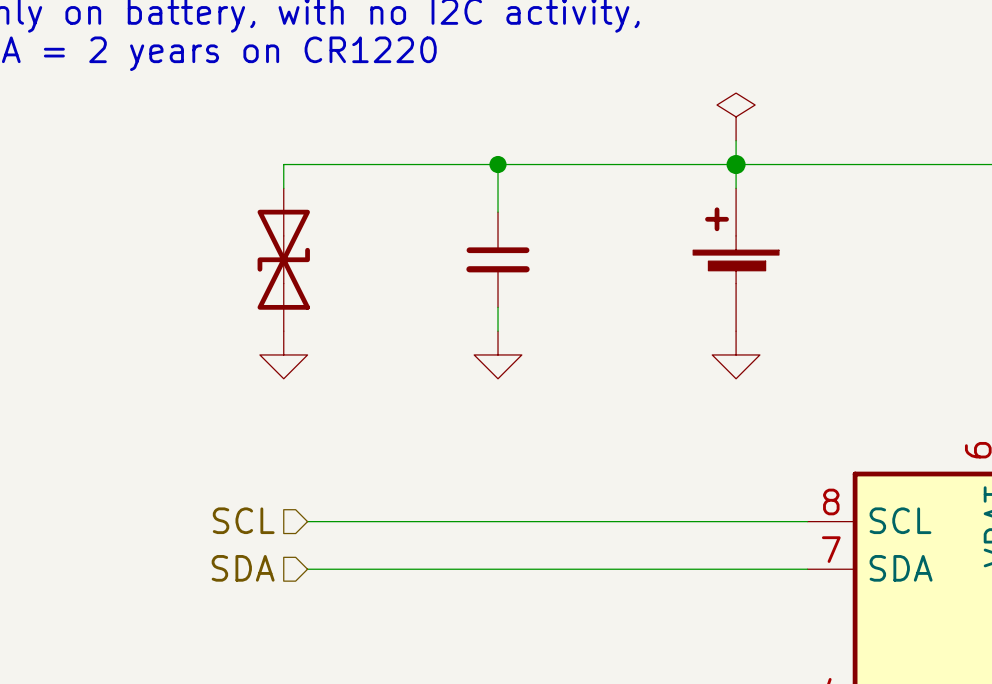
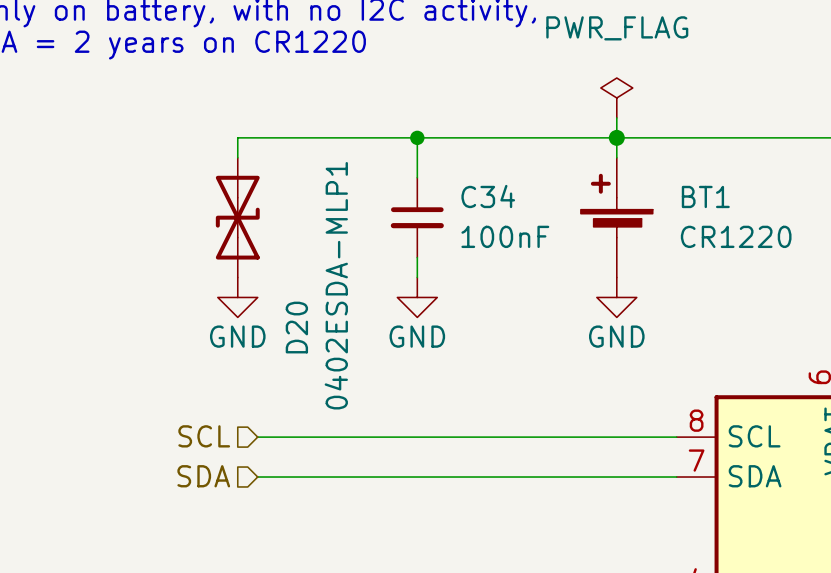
power symbol text: none -> PWR_FLAG (617, 28)
C34 name: none -> C34 (488, 196)
BT1 name: none -> BT1 (705, 196)
C34 value: none -> 100nF (505, 236)
BT1 value: none -> CR1220 (736, 236)
D20 value: none -> 0402ESDA-MLP1 (336, 285)
D20 name: none -> D20 (296, 327)
power symbol text: none -> GND (237, 336)
power symbol text: none -> GND (417, 336)
power symbol text: none -> GND (616, 336)

